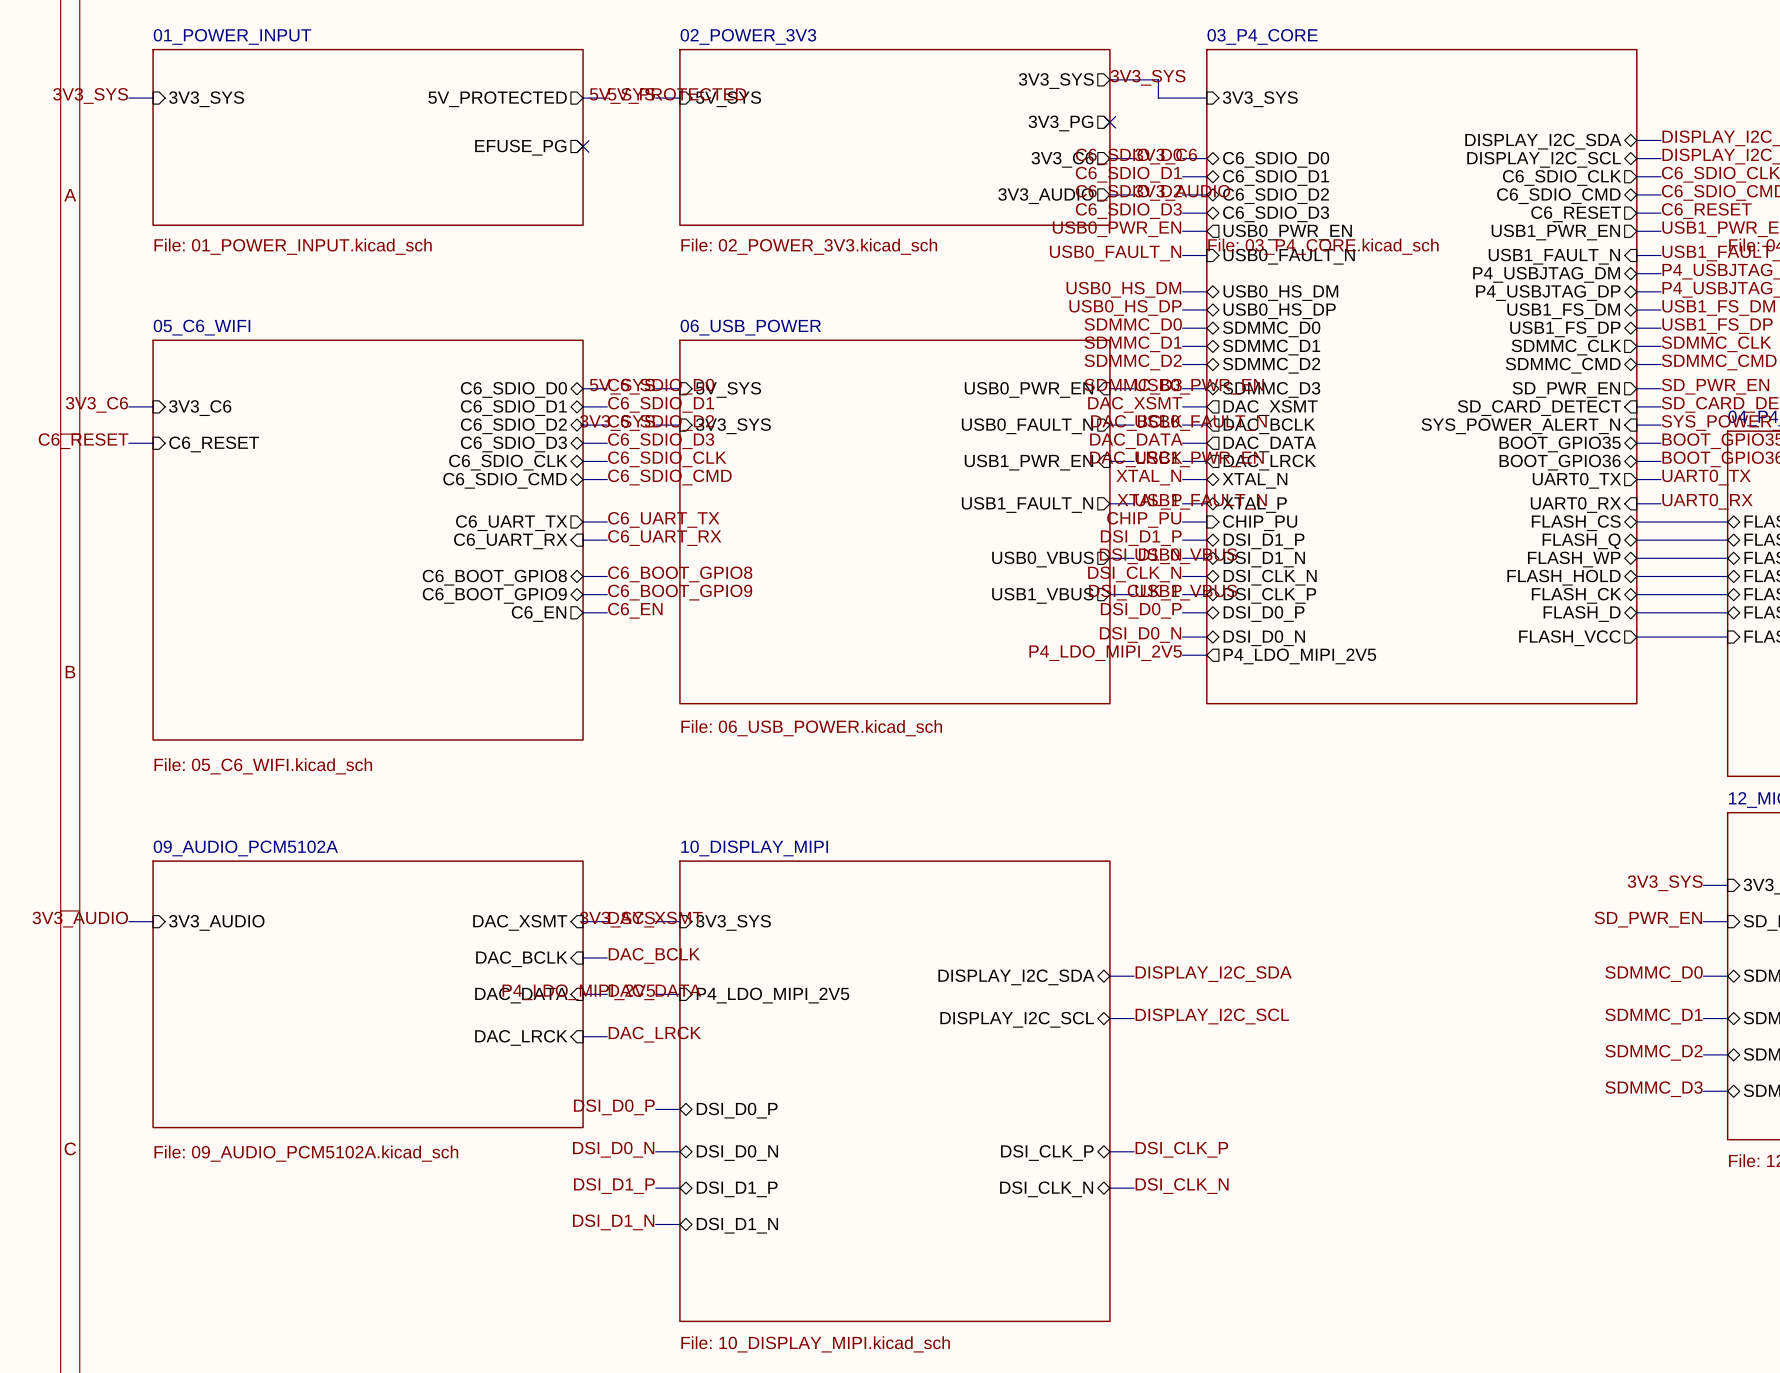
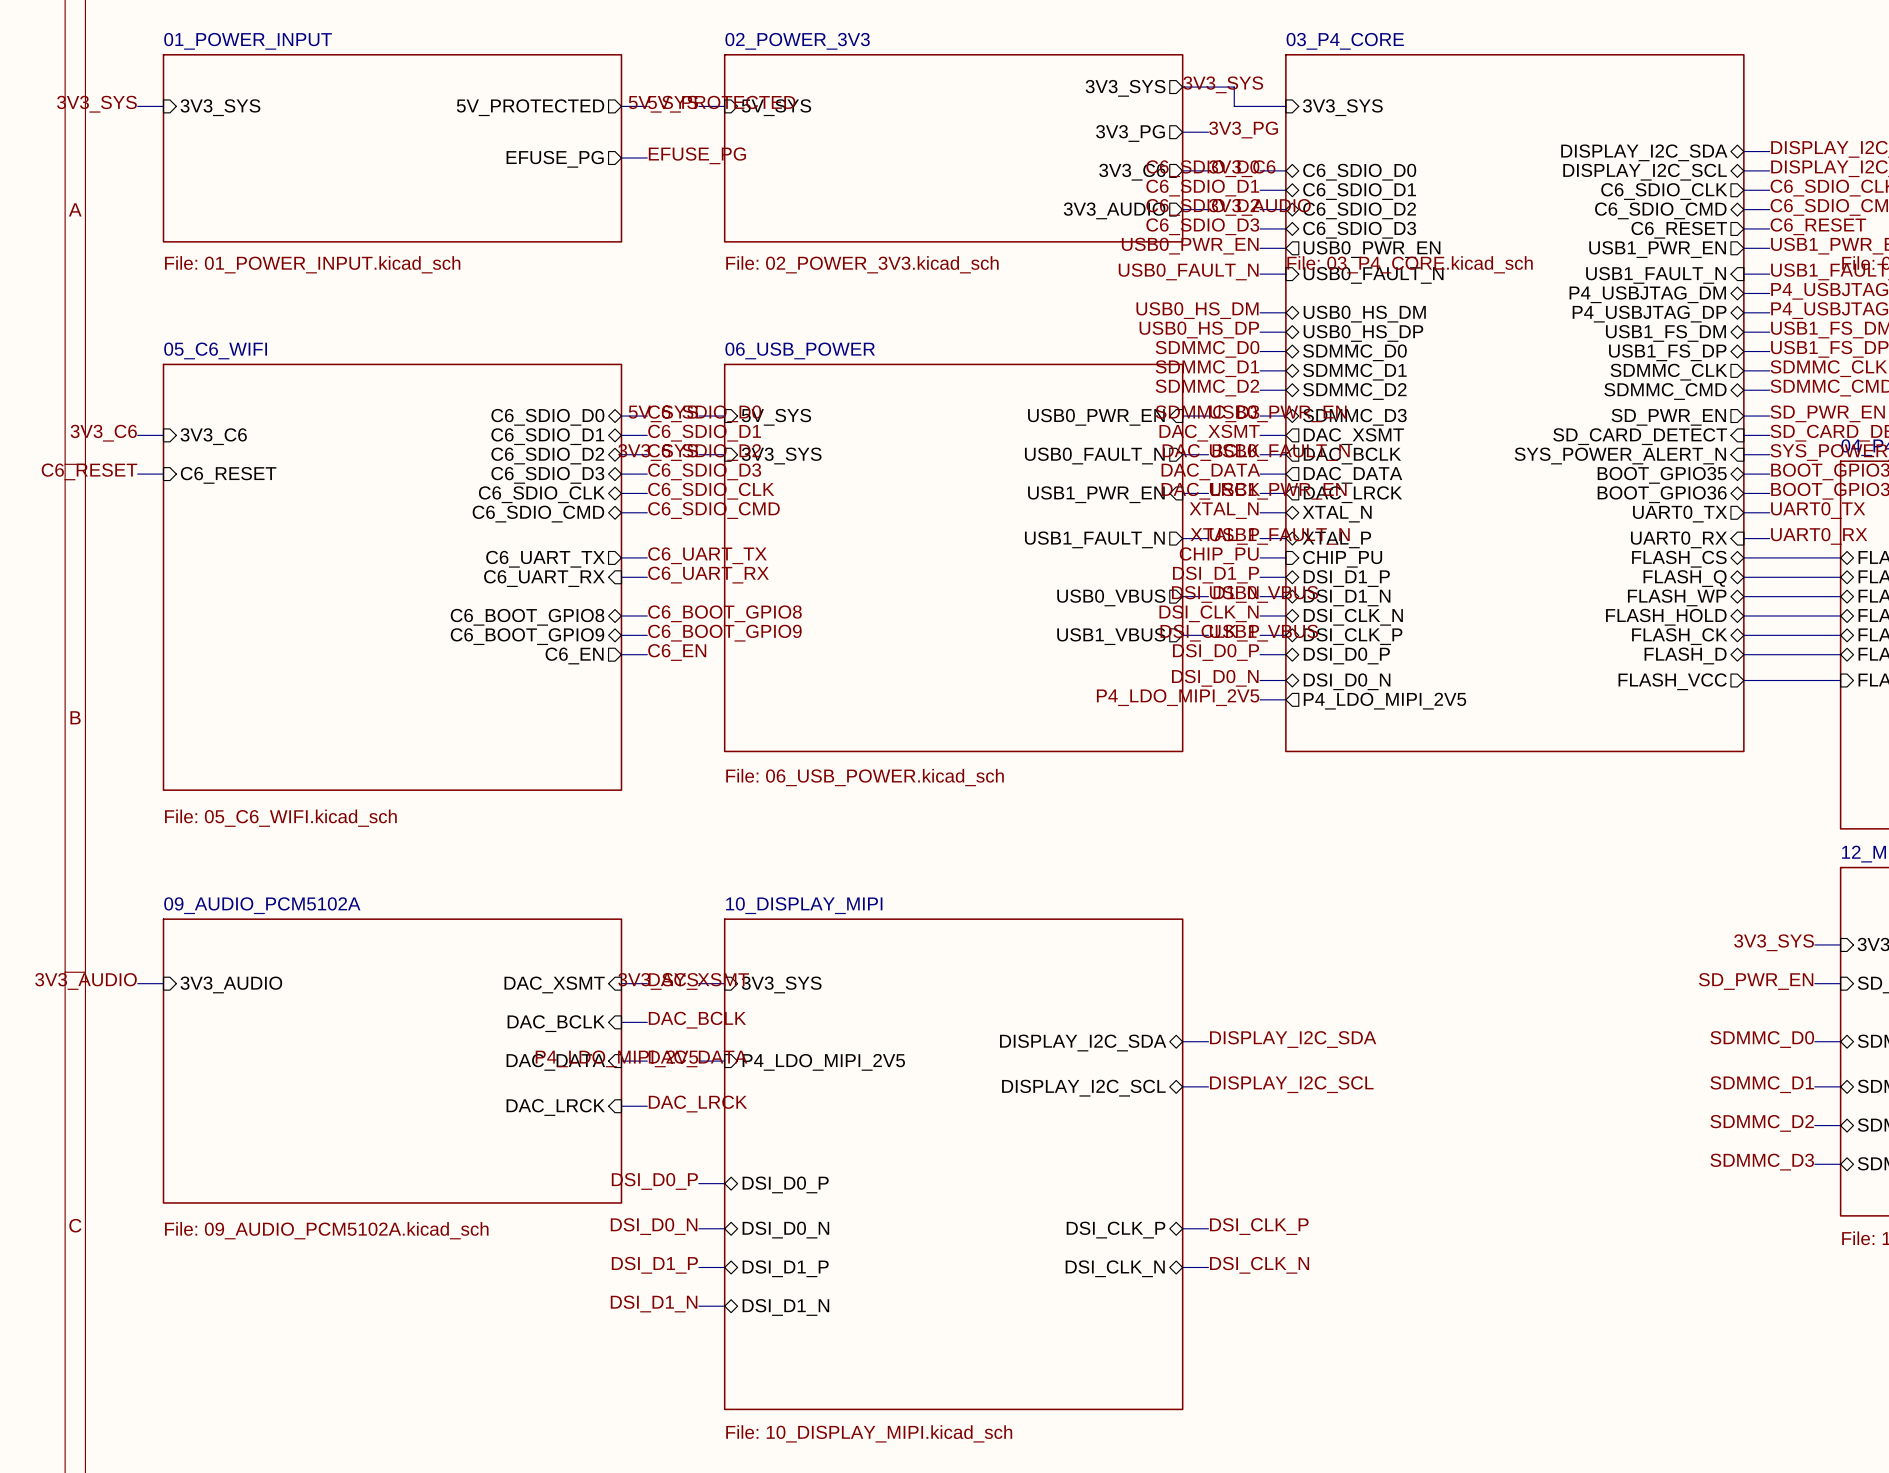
label: none -> 3V3_PG (1243, 130)
wire: none -> (1182, 132) (1208, 132)
no-connect mark: (1109, 122) -> none
label: none -> EFUSE_PG (697, 155)
wire: none -> (621, 158) (647, 158)
no-connect mark: (583, 146) -> none

